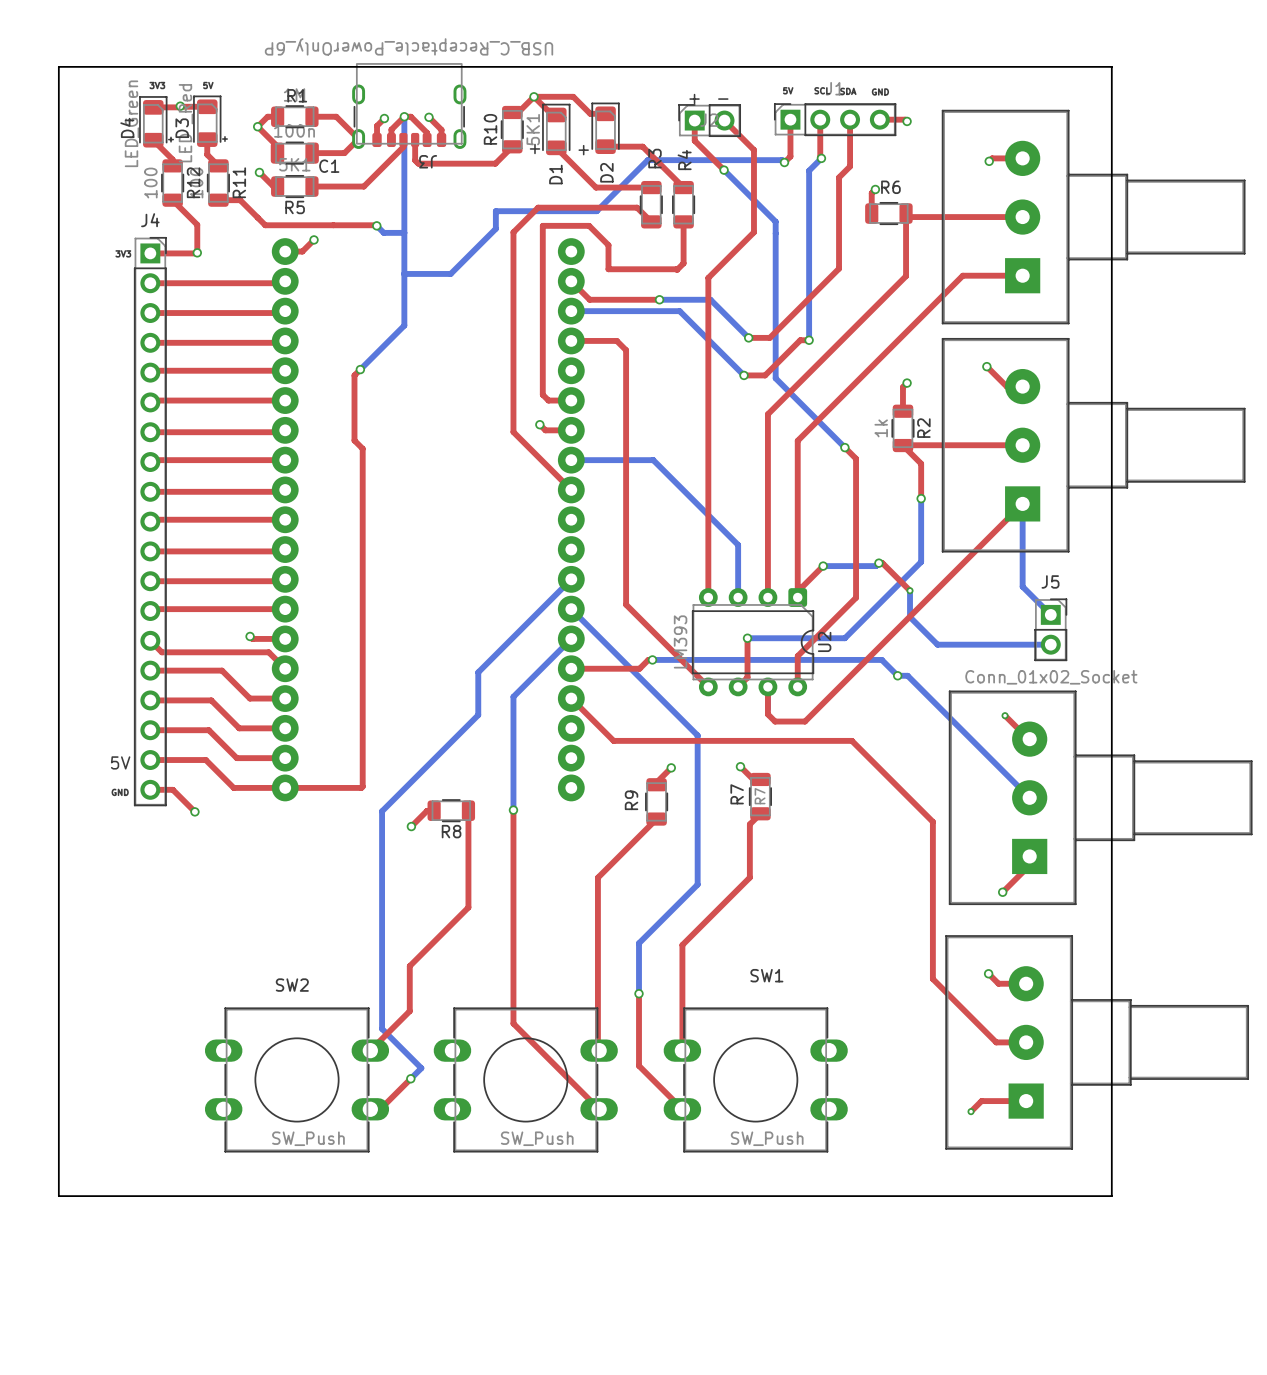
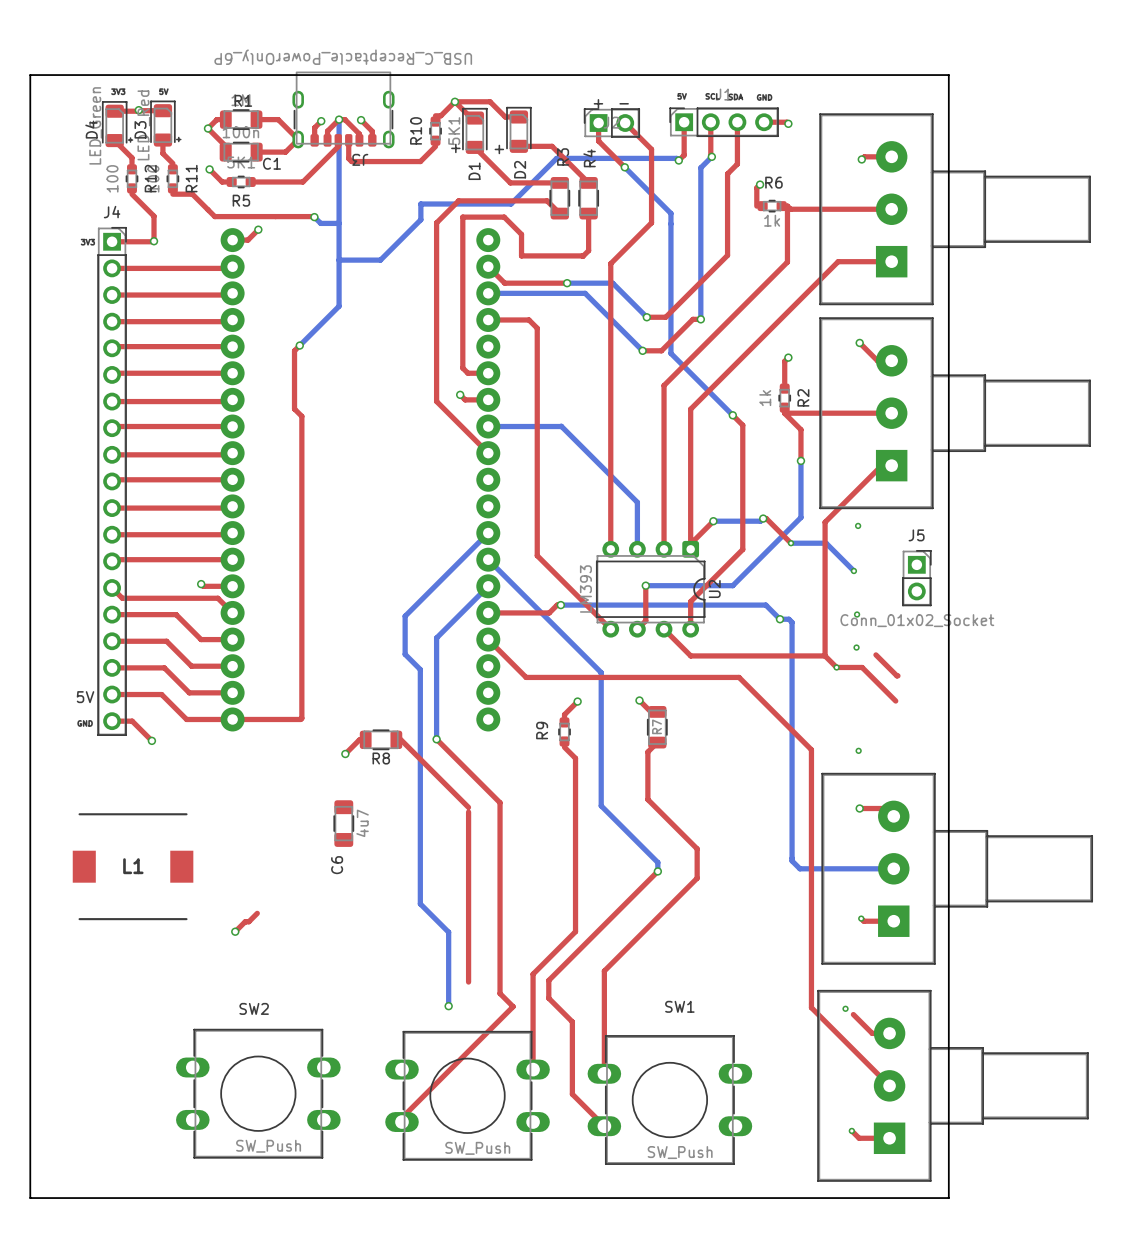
board edge: (1086, 66) (1111, 66) (1111, 1196) (58, 1196) -> (948, 75) (948, 1198) (30, 1198) (30, 1084)
R10 footprint: [500, 105, 524, 154] -> [429, 116, 442, 146]
R12 footprint: [161, 159, 185, 207] -> [125, 164, 139, 194]
R11 footprint: [207, 159, 230, 207] -> [166, 164, 179, 194]
R5 footprint: [271, 175, 319, 198] -> [226, 175, 256, 189]
R6 footprint: [865, 202, 913, 225] -> [757, 200, 787, 213]
R6 value: none -> 1k (772, 220)
R2 footprint: [891, 404, 915, 453] -> [778, 383, 791, 413]
top track: (1022, 503) (805, 721) (775, 721) (767, 714) (767, 686) -> (891, 465) (881, 465) (825, 522) (825, 655)
bottom track: (1022, 503) (1022, 586) (1050, 614) -> none
via: none -> (858, 525)
bottom track: (910, 590) (910, 617) (937, 644) (1050, 644) -> (791, 543) (826, 543) (853, 571)
via: none -> (853, 571)
via: none -> (857, 614)
bottom track: (911, 679) (1029, 797) -> (792, 622) (792, 860) (799, 868) (893, 868)
top track: none -> (664, 629) (690, 655) (825, 655)
via: none -> (856, 647)
bottom track: (478, 715) (382, 811) (382, 1028) (421, 1068) (410, 1078) -> (405, 654) (420, 669) (420, 903) (448, 932) (448, 1006)
via: (1005, 715) -> none
top track: none -> (825, 655) (836, 667) (862, 667) (895, 701)
via: none -> (836, 667)
R9 footprint: [645, 778, 668, 826] -> [558, 717, 571, 747]
text: R7 (737, 794) -> none
part: (1100, 797) -> none
top track: none -> (396, 735) (468, 807)
top track: (468, 810) (468, 907) (409, 966) (409, 1011) (370, 1050) -> none
top track: (513, 810) (513, 1023) (584, 1094) -> (436, 739) (500, 802) (500, 993)
top track: (656, 819) (597, 877) (597, 1049) -> (564, 747) (575, 758) (575, 931) (533, 974) (533, 1069)
via: none -> (858, 750)
top track: (1029, 856) (1029, 865) (1002, 892) -> none
top track: (749, 877) (682, 945) (682, 1050) -> (647, 799) (697, 848) (697, 878) (604, 971) (604, 1073)
bottom track: (697, 884) (639, 943) (639, 993) -> (601, 805) (657, 862) (657, 871)
top track: none -> (859, 808) (885, 808) (893, 816)
top track: none -> (468, 812) (468, 982)
via position: (1002, 892) -> (859, 808)
C6: none -> 4u7 (343, 823)
L1: none -> (133, 866)
part: none -> (957, 868)
top track: none -> (657, 871) (548, 980) (548, 998) (572, 1021) (572, 1094) (604, 1126)
via: none -> (657, 871)
top track: (988, 973) (998, 983) (1026, 983) -> none
via: (988, 973) -> none
top track: (932, 979) (996, 1042) (1026, 1042) -> (811, 890) (811, 1007) (889, 1085)
top track: (639, 993) (639, 1065) (682, 1109) -> none
via: (639, 993) -> none
top track: none -> (257, 913) (235, 931)
top track: none -> (861, 918) (863, 921) (893, 921)
via: none -> (861, 918)
via: none -> (235, 931)
part: (1097, 1042) -> none
top track: (410, 1078) (380, 1109) (370, 1109) -> none
via: (410, 1078) -> none
SW2 position: (297, 1079) -> (258, 1093)
part position: (525, 1079) -> (467, 1095)
SW1 position: (755, 1079) -> (669, 1100)
top track: (1026, 1101) (981, 1101) (971, 1111) -> none
via: none -> (448, 1006)
top track: none -> (513, 1006) (401, 1117) (401, 1122)
top track: none -> (853, 1014) (872, 1033) (889, 1033)
part: none -> (953, 1085)
top track: none -> (851, 1130) (859, 1138) (889, 1138)
via: none -> (851, 1130)

